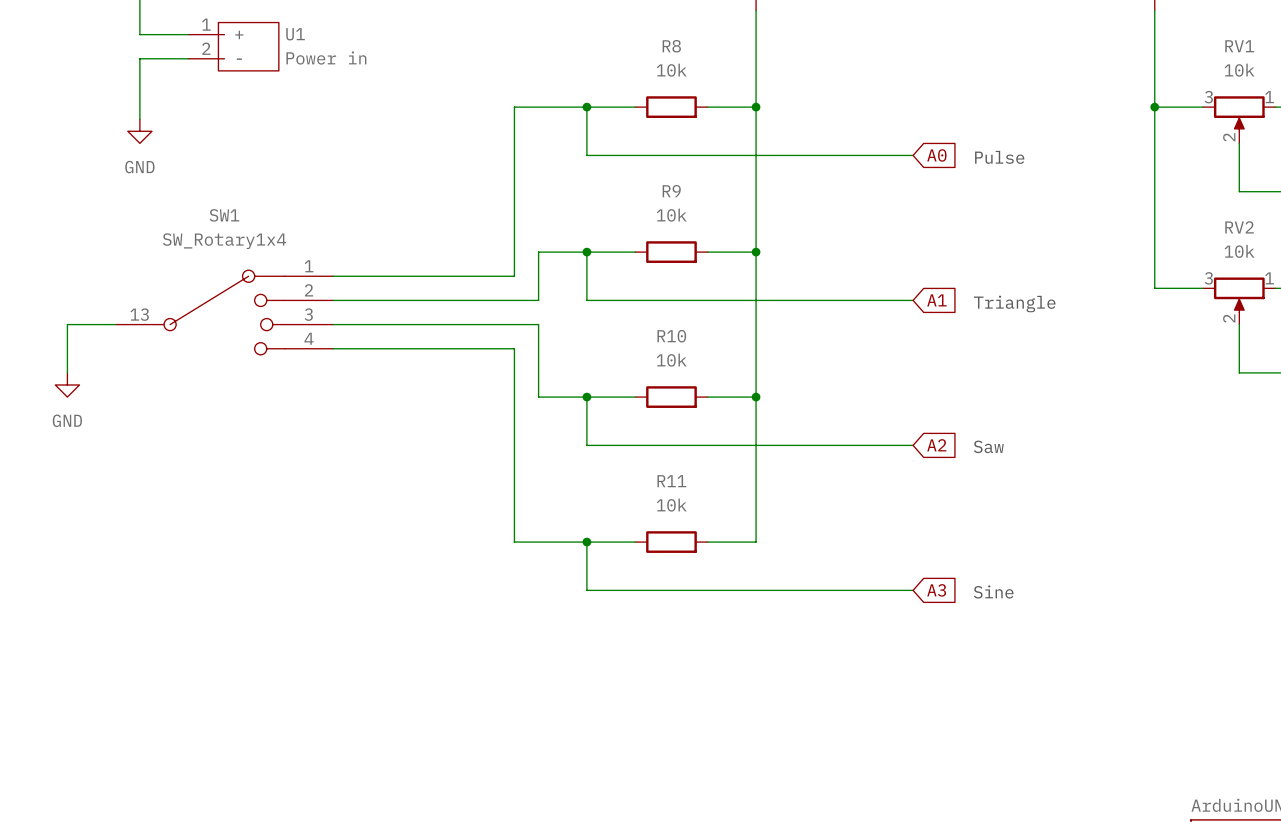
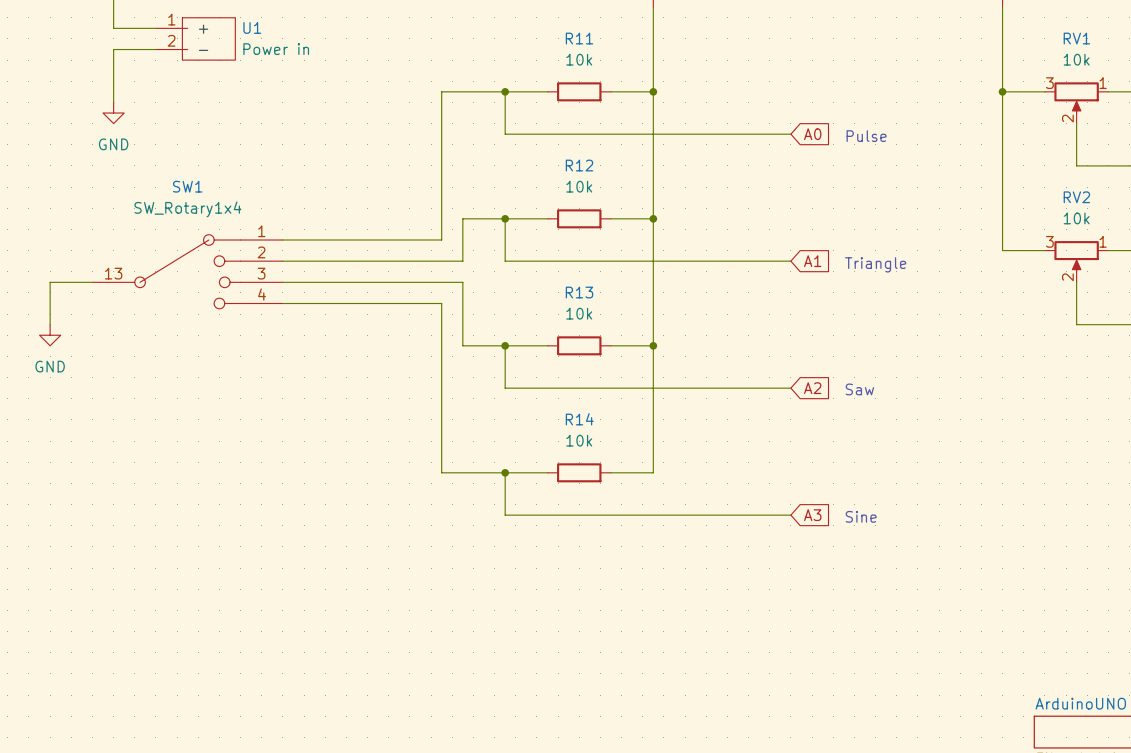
R8 name: R8 (671, 46) -> R11 (579, 38)
R9 name: R9 (671, 191) -> R12 (579, 165)
R10 name: R10 (671, 336) -> R13 (579, 292)
R11 name: R11 (671, 481) -> R14 (579, 419)

